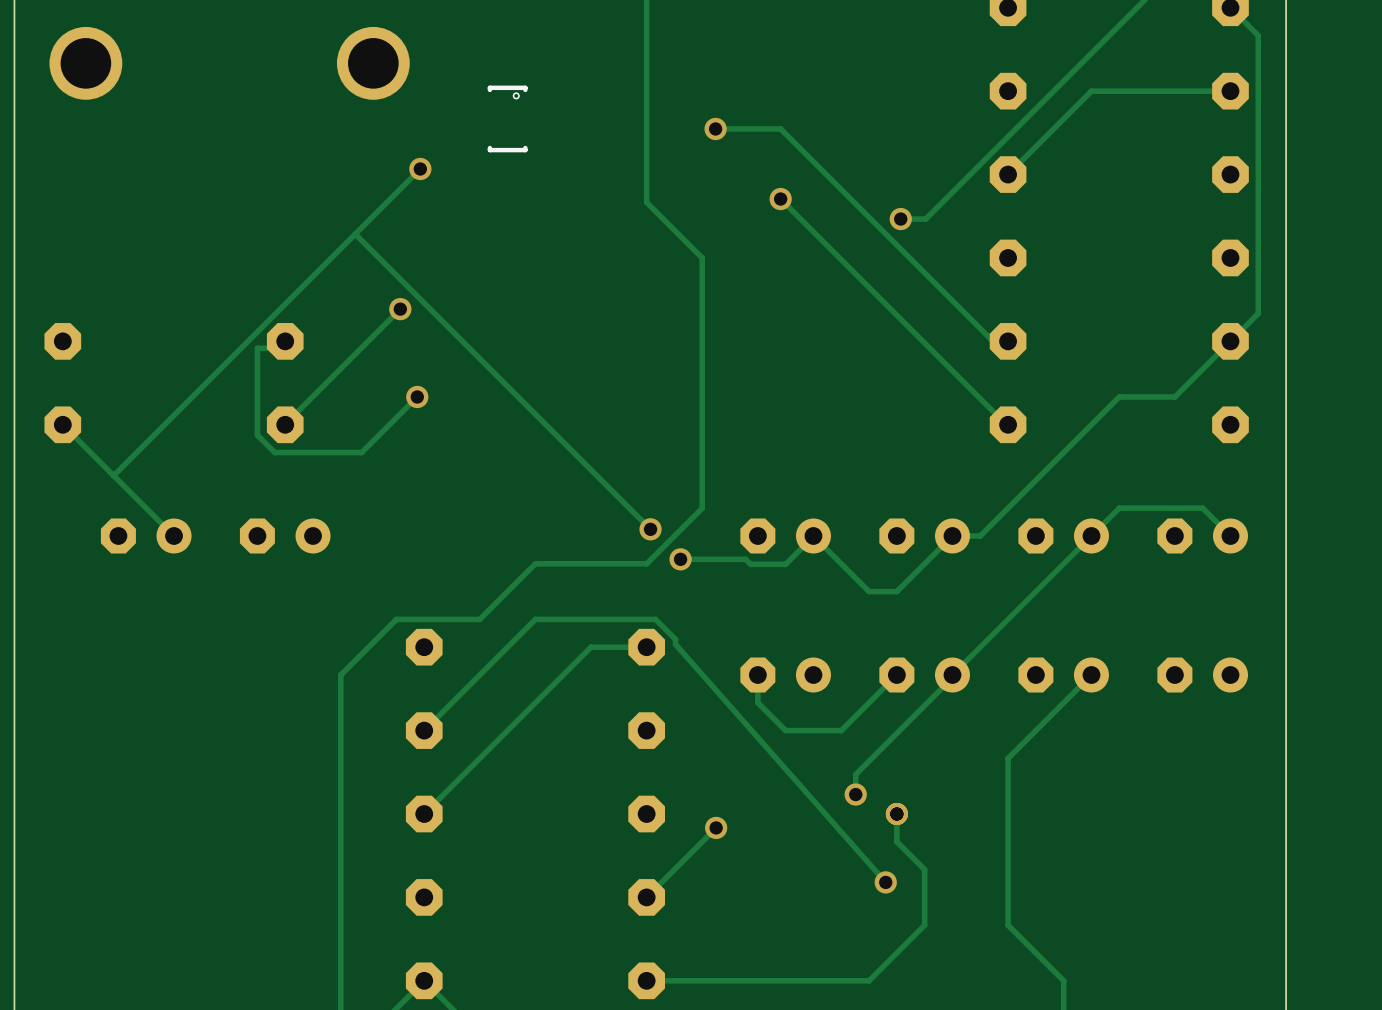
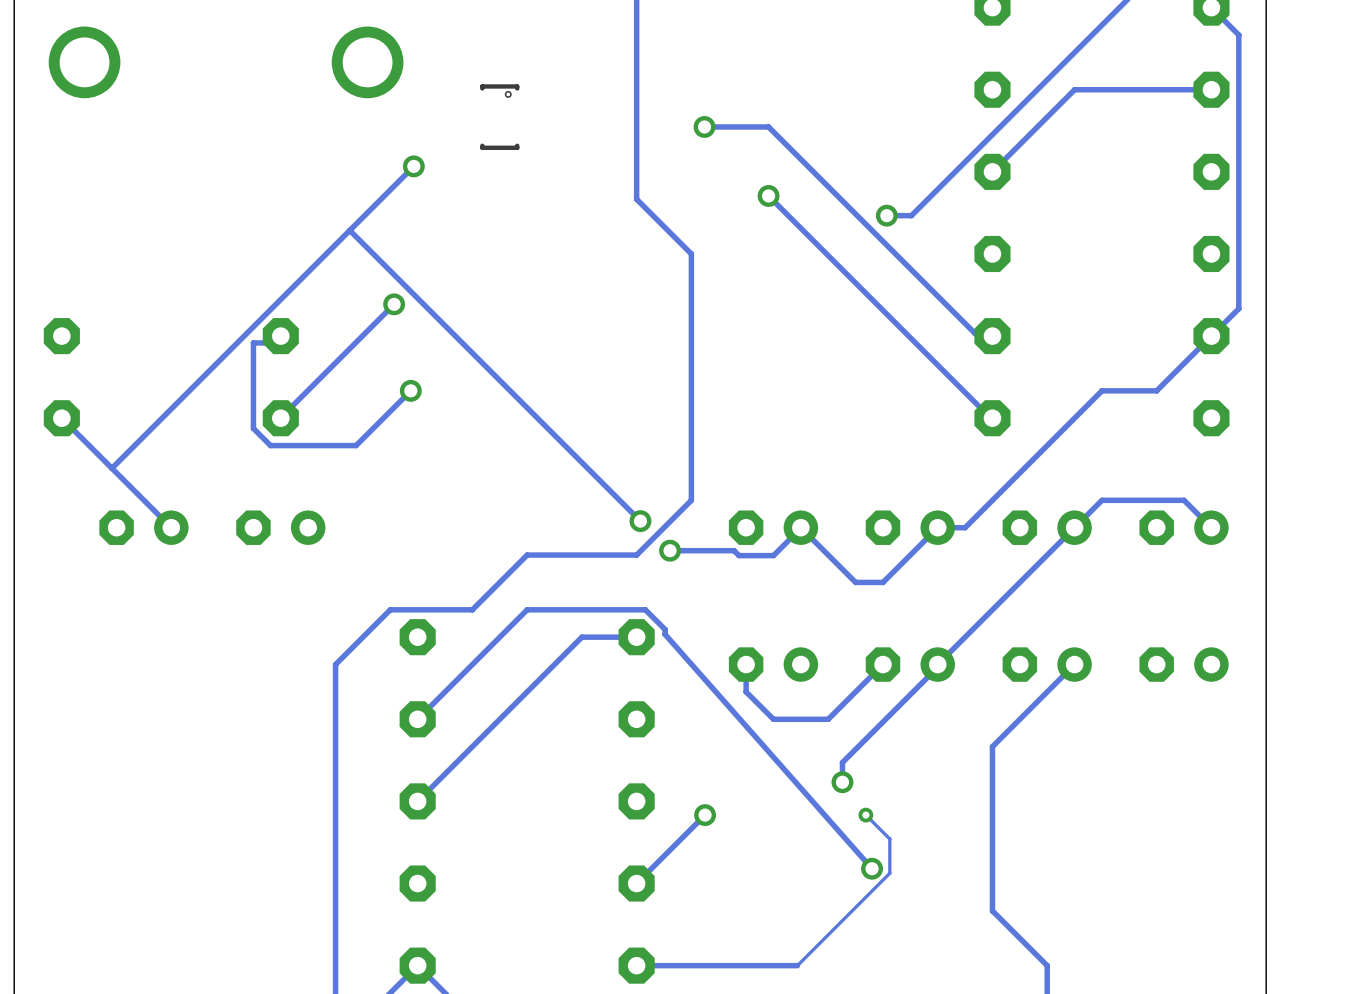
track: (896, 814) (896, 841) (924, 869) (924, 925) (869, 980) (809, 980) -> (865, 815) (889, 839) (889, 873) (797, 965)
via: (896, 814) -> none
via: none -> (865, 815)

